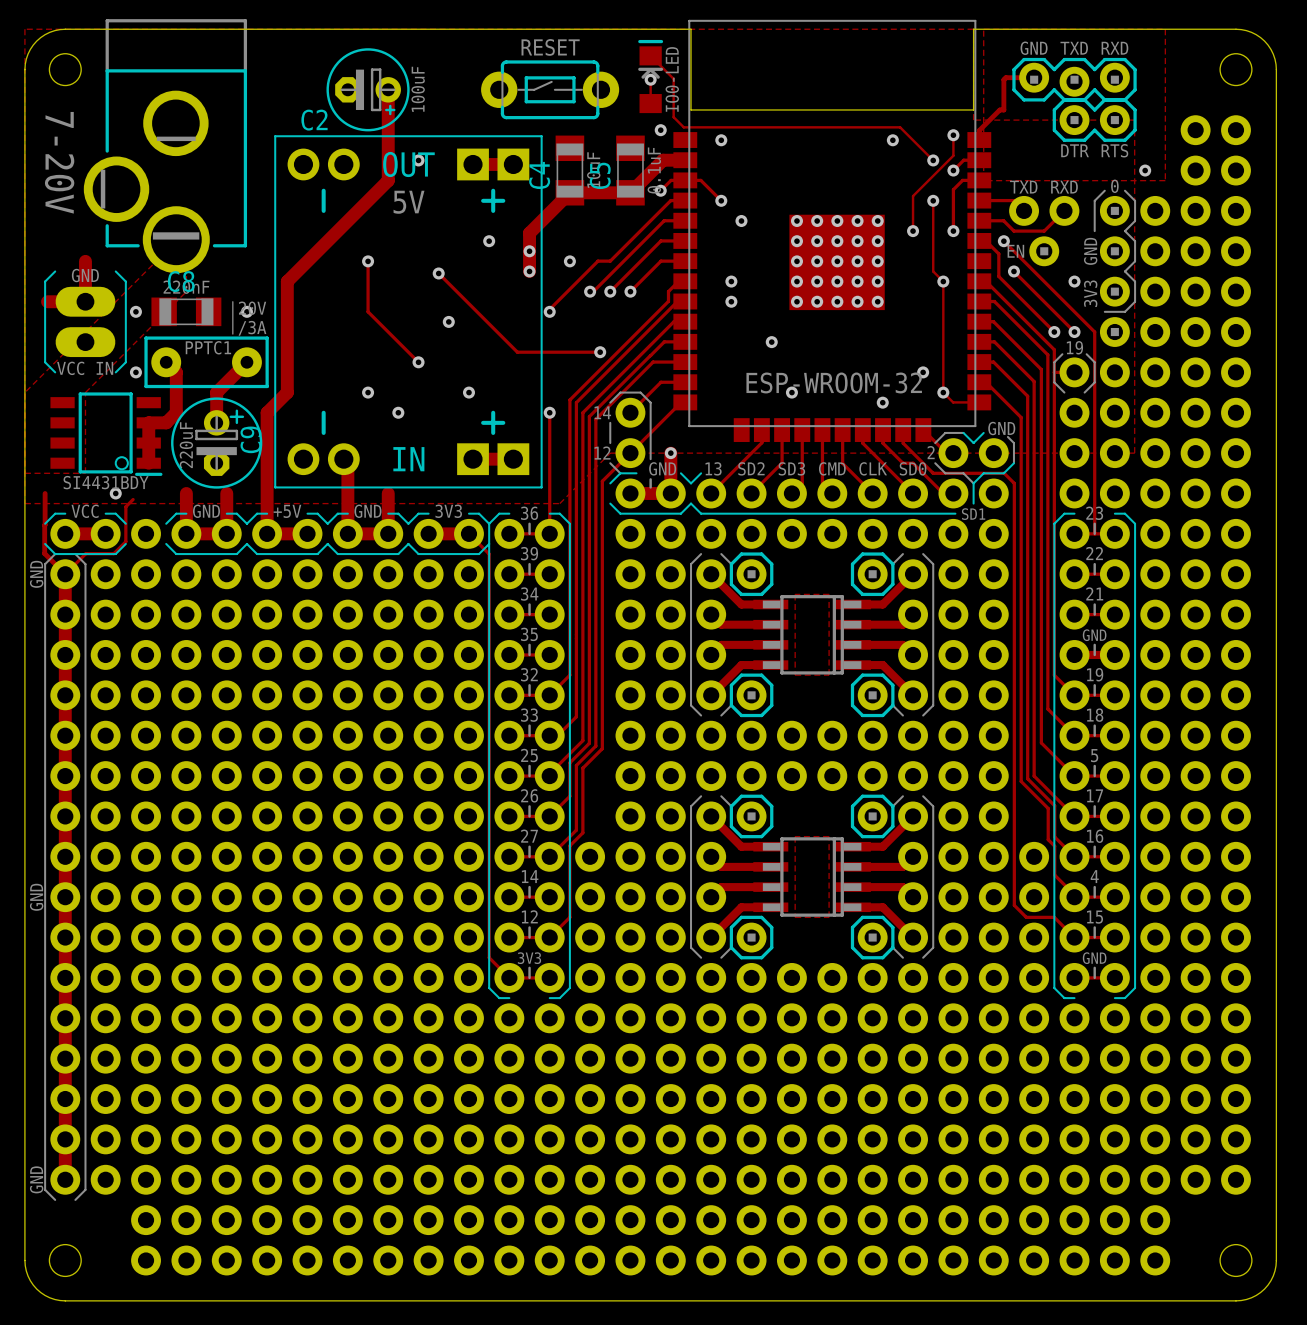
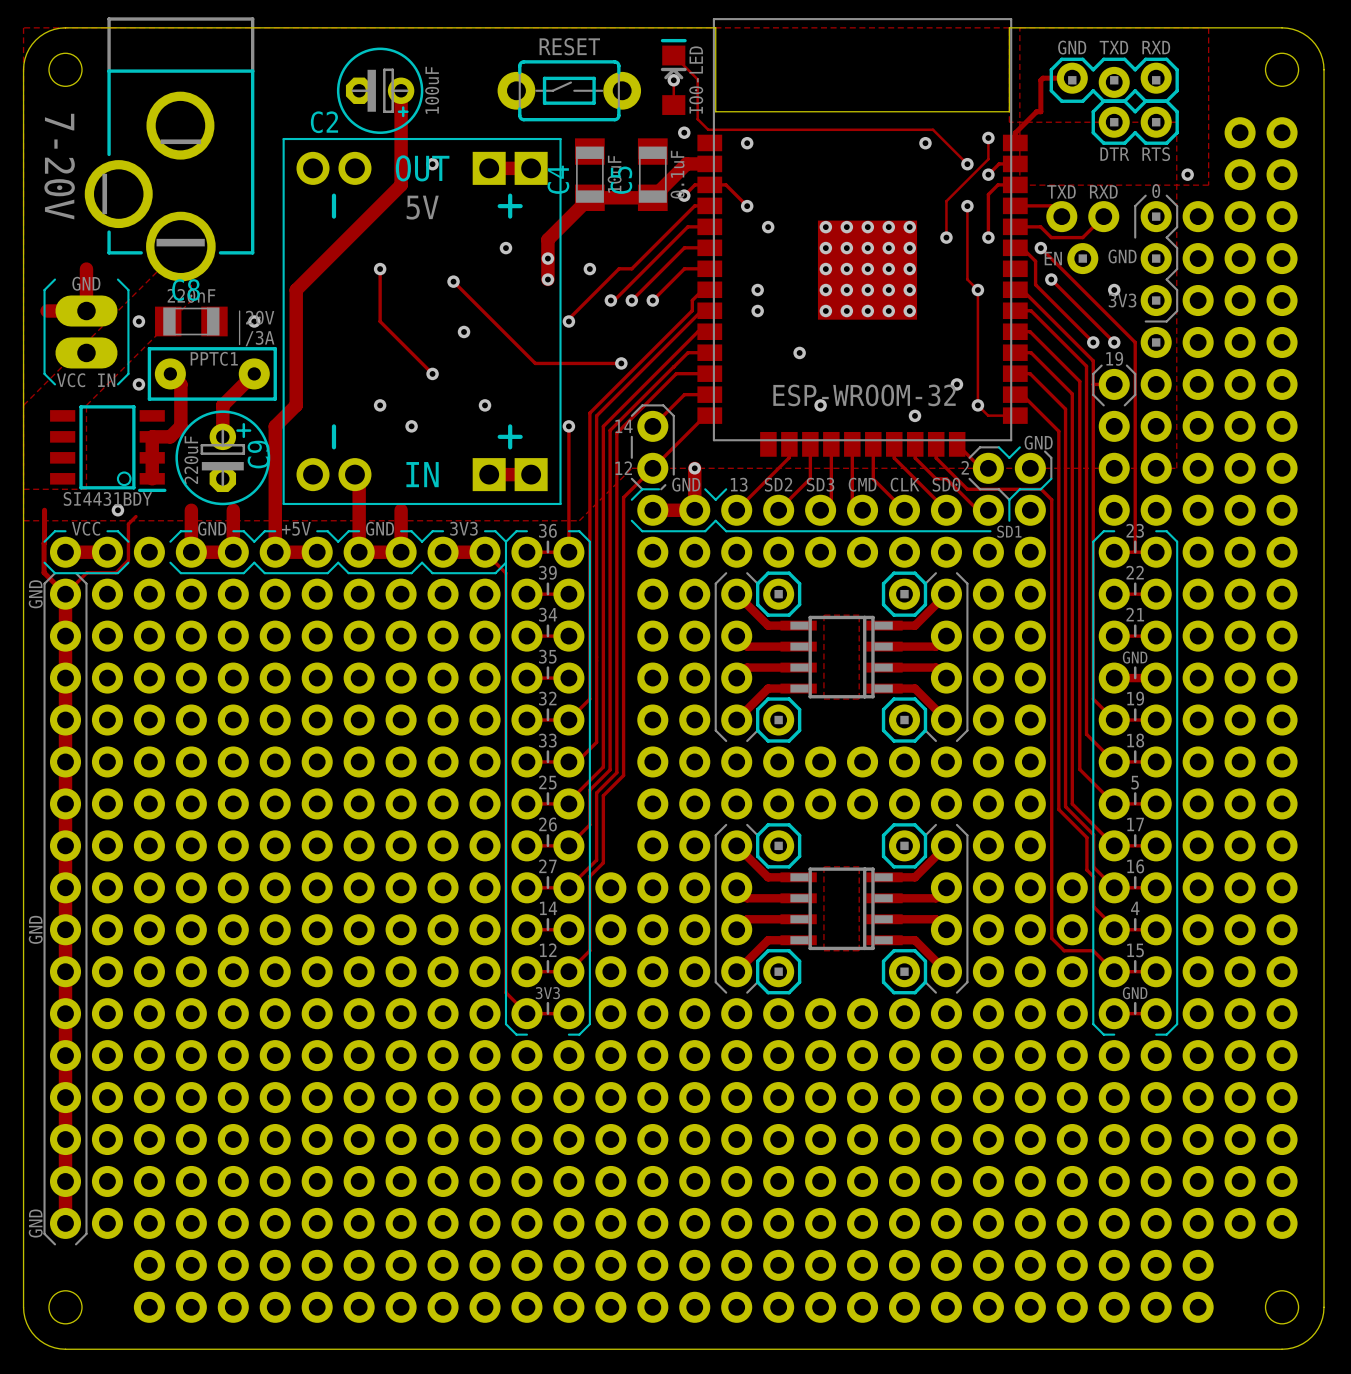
text rotation: 0° (1090, 251) -> 90° clockwise (1122, 256)
text rotation: 0° (1090, 293) -> 90° clockwise (1122, 300)
line: none -> (665, 485) (661, 489)
line: (650, 479) (650, 487) -> none

